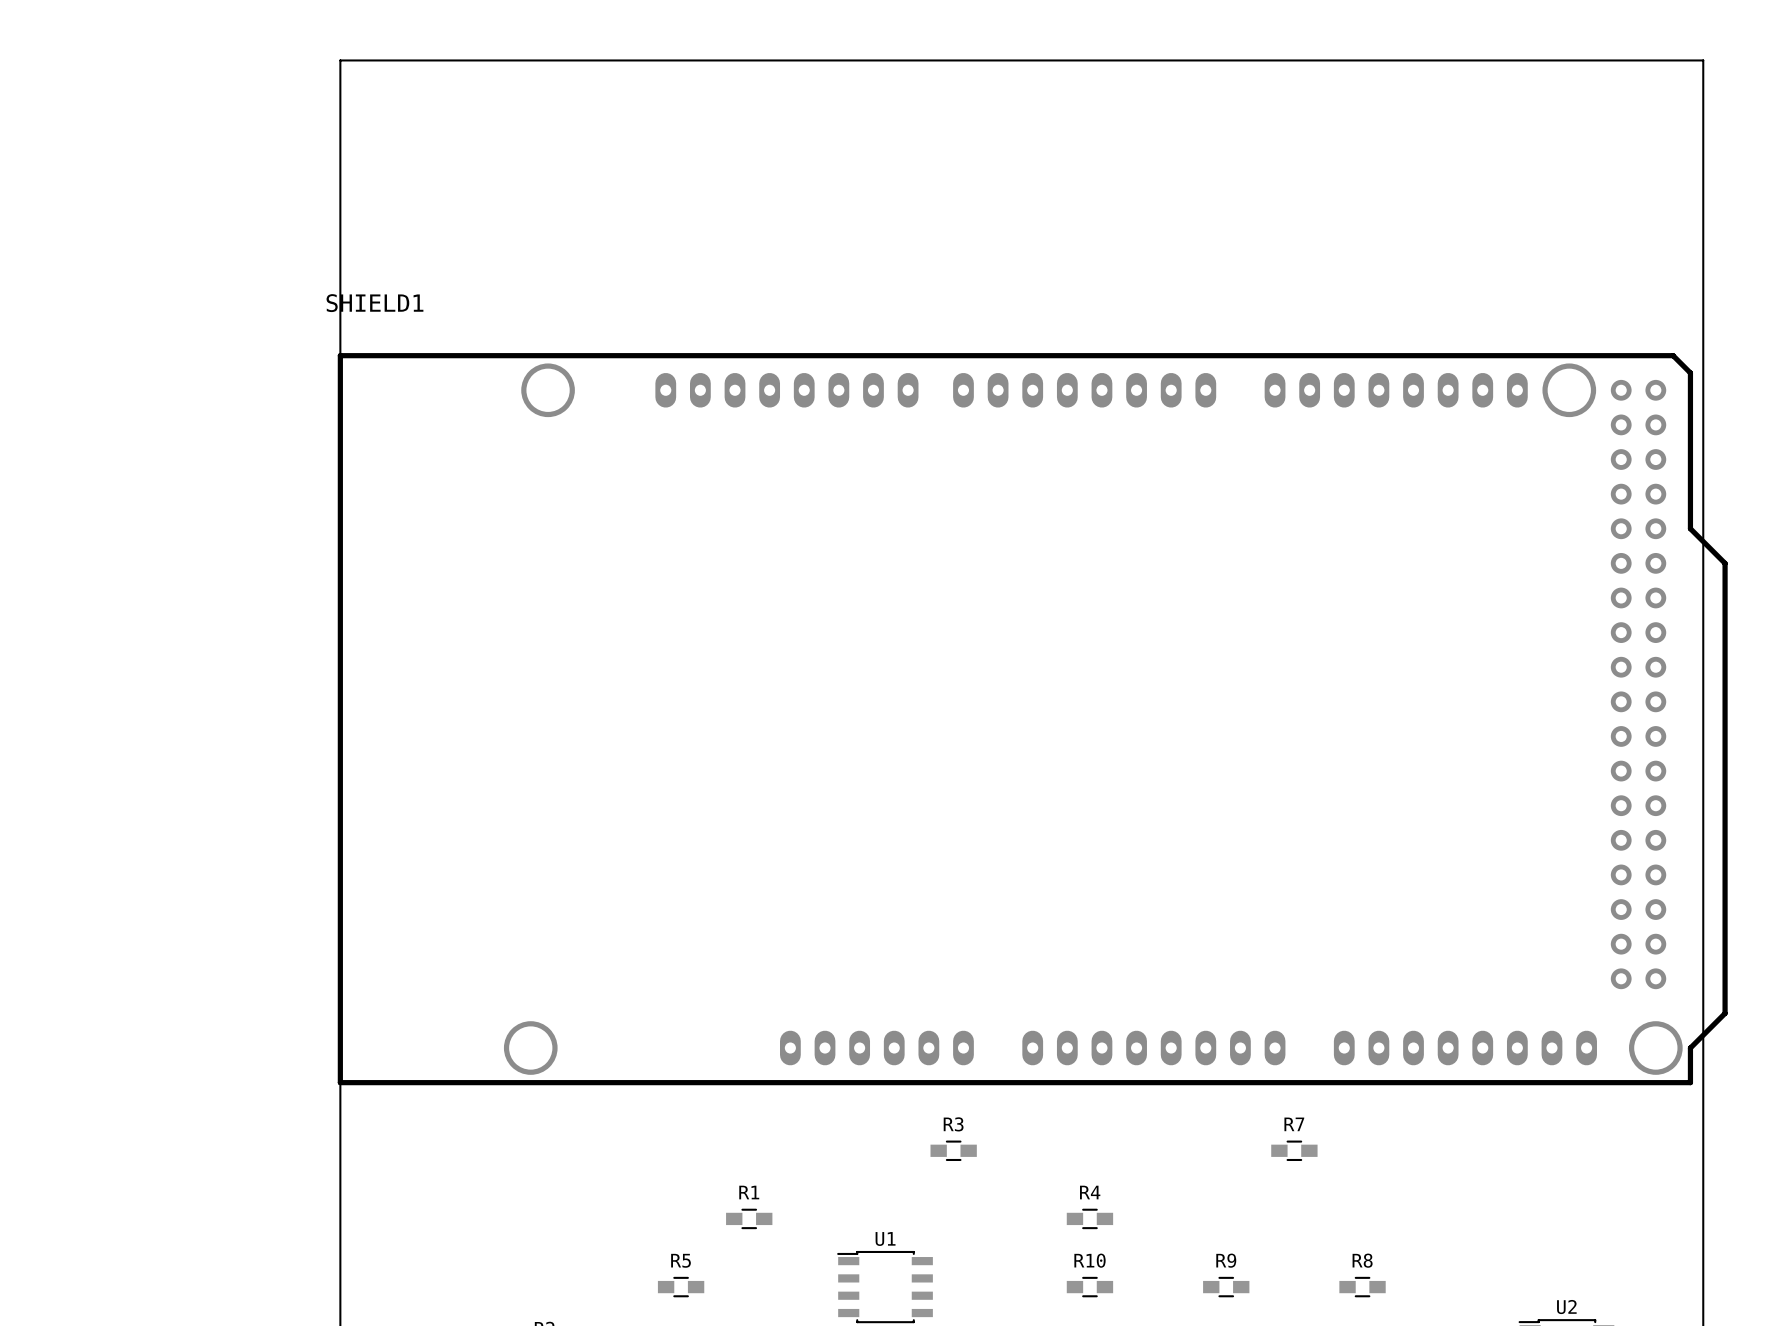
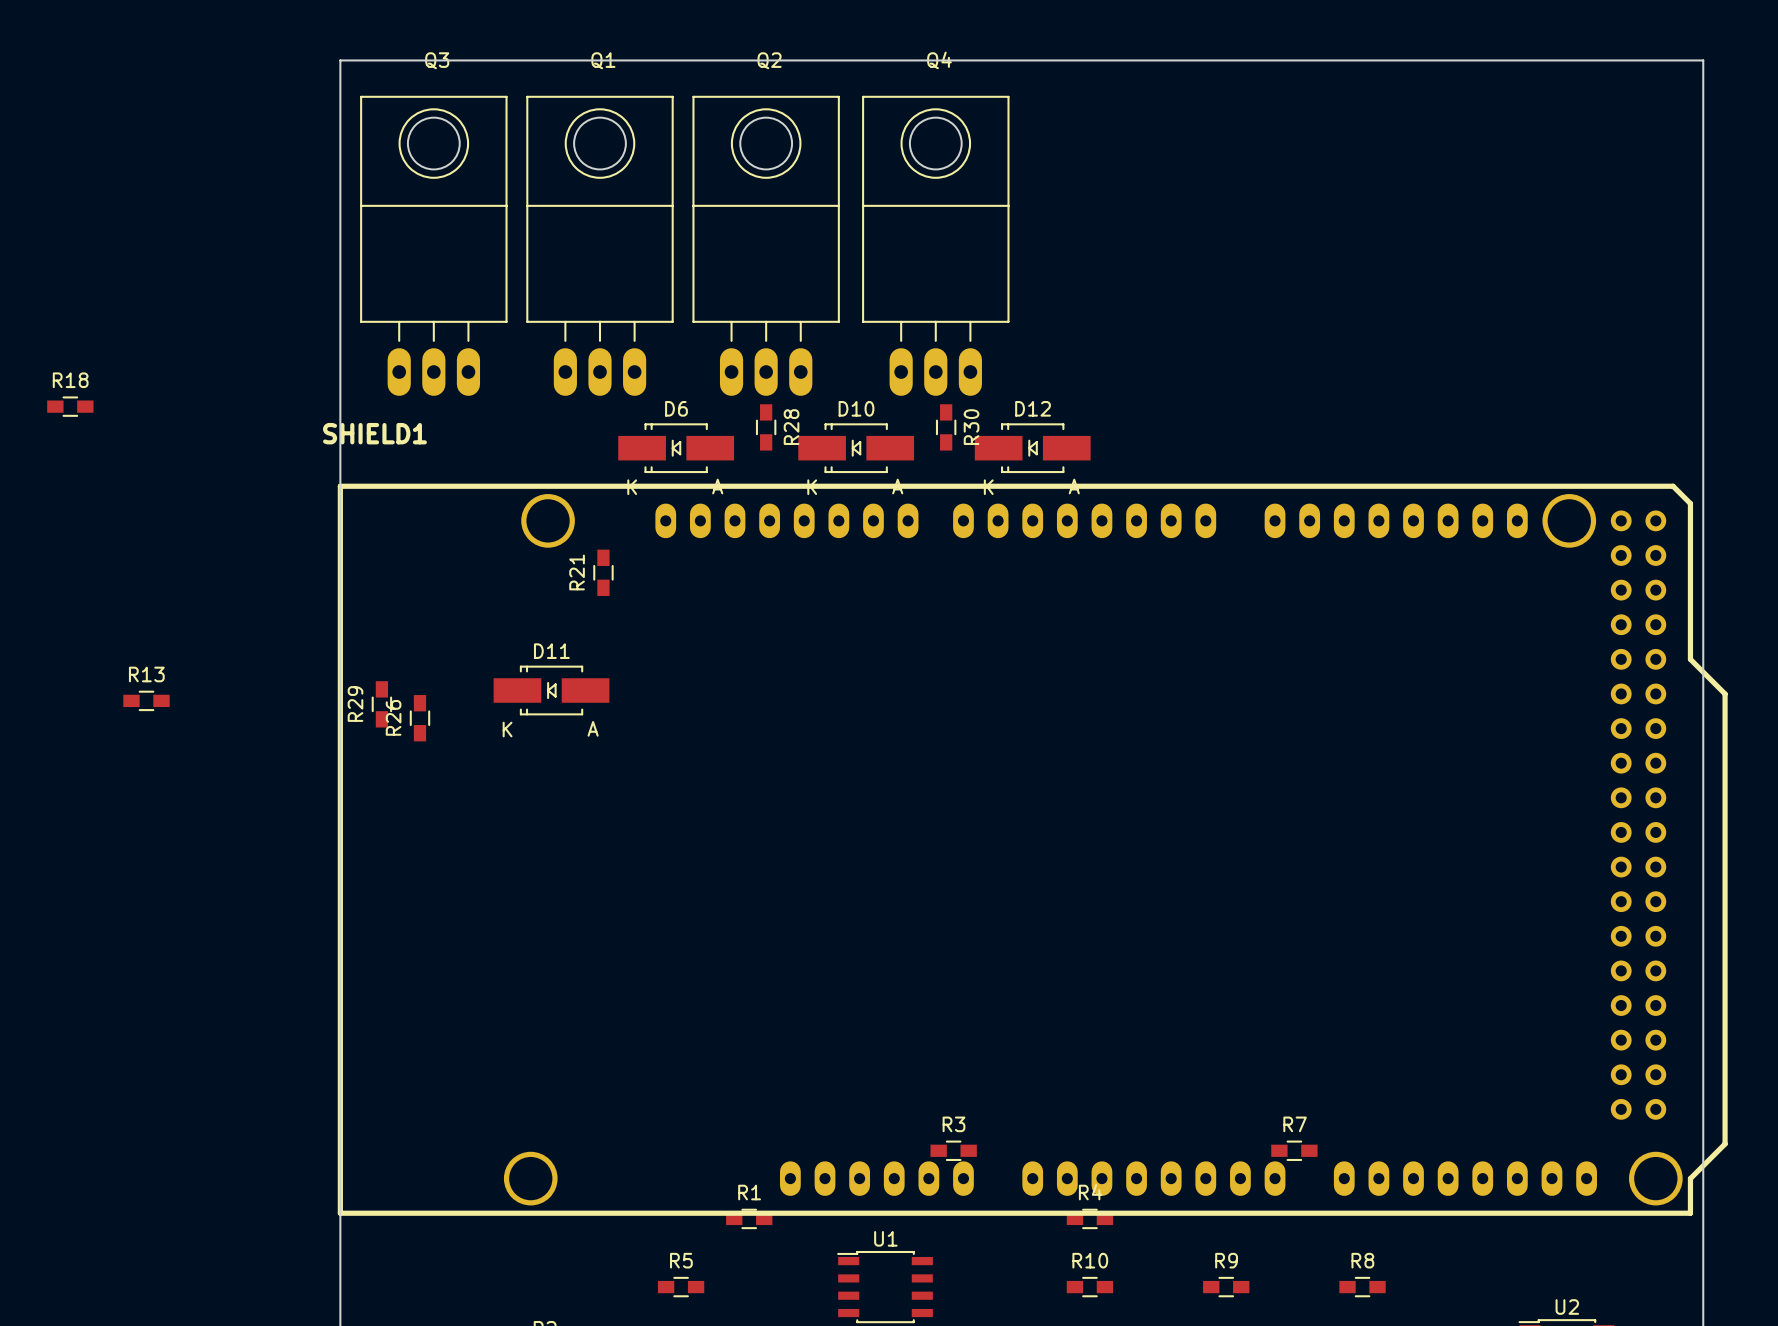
Q3: none -> (433, 245)
Q1: none -> (599, 245)
Q2: none -> (766, 245)
Q4: none -> (935, 245)
R18: none -> (70, 406)
R28: none -> (766, 427)
R30: none -> (946, 427)
D6: none -> (676, 448)
D10: none -> (856, 448)
D12: none -> (1032, 448)
R21: none -> (603, 572)
D11: none -> (551, 690)
R13: none -> (146, 700)
R29: none -> (381, 704)
R26: none -> (419, 718)
SHIELD1 position: (1032, 719) -> (1032, 849)

